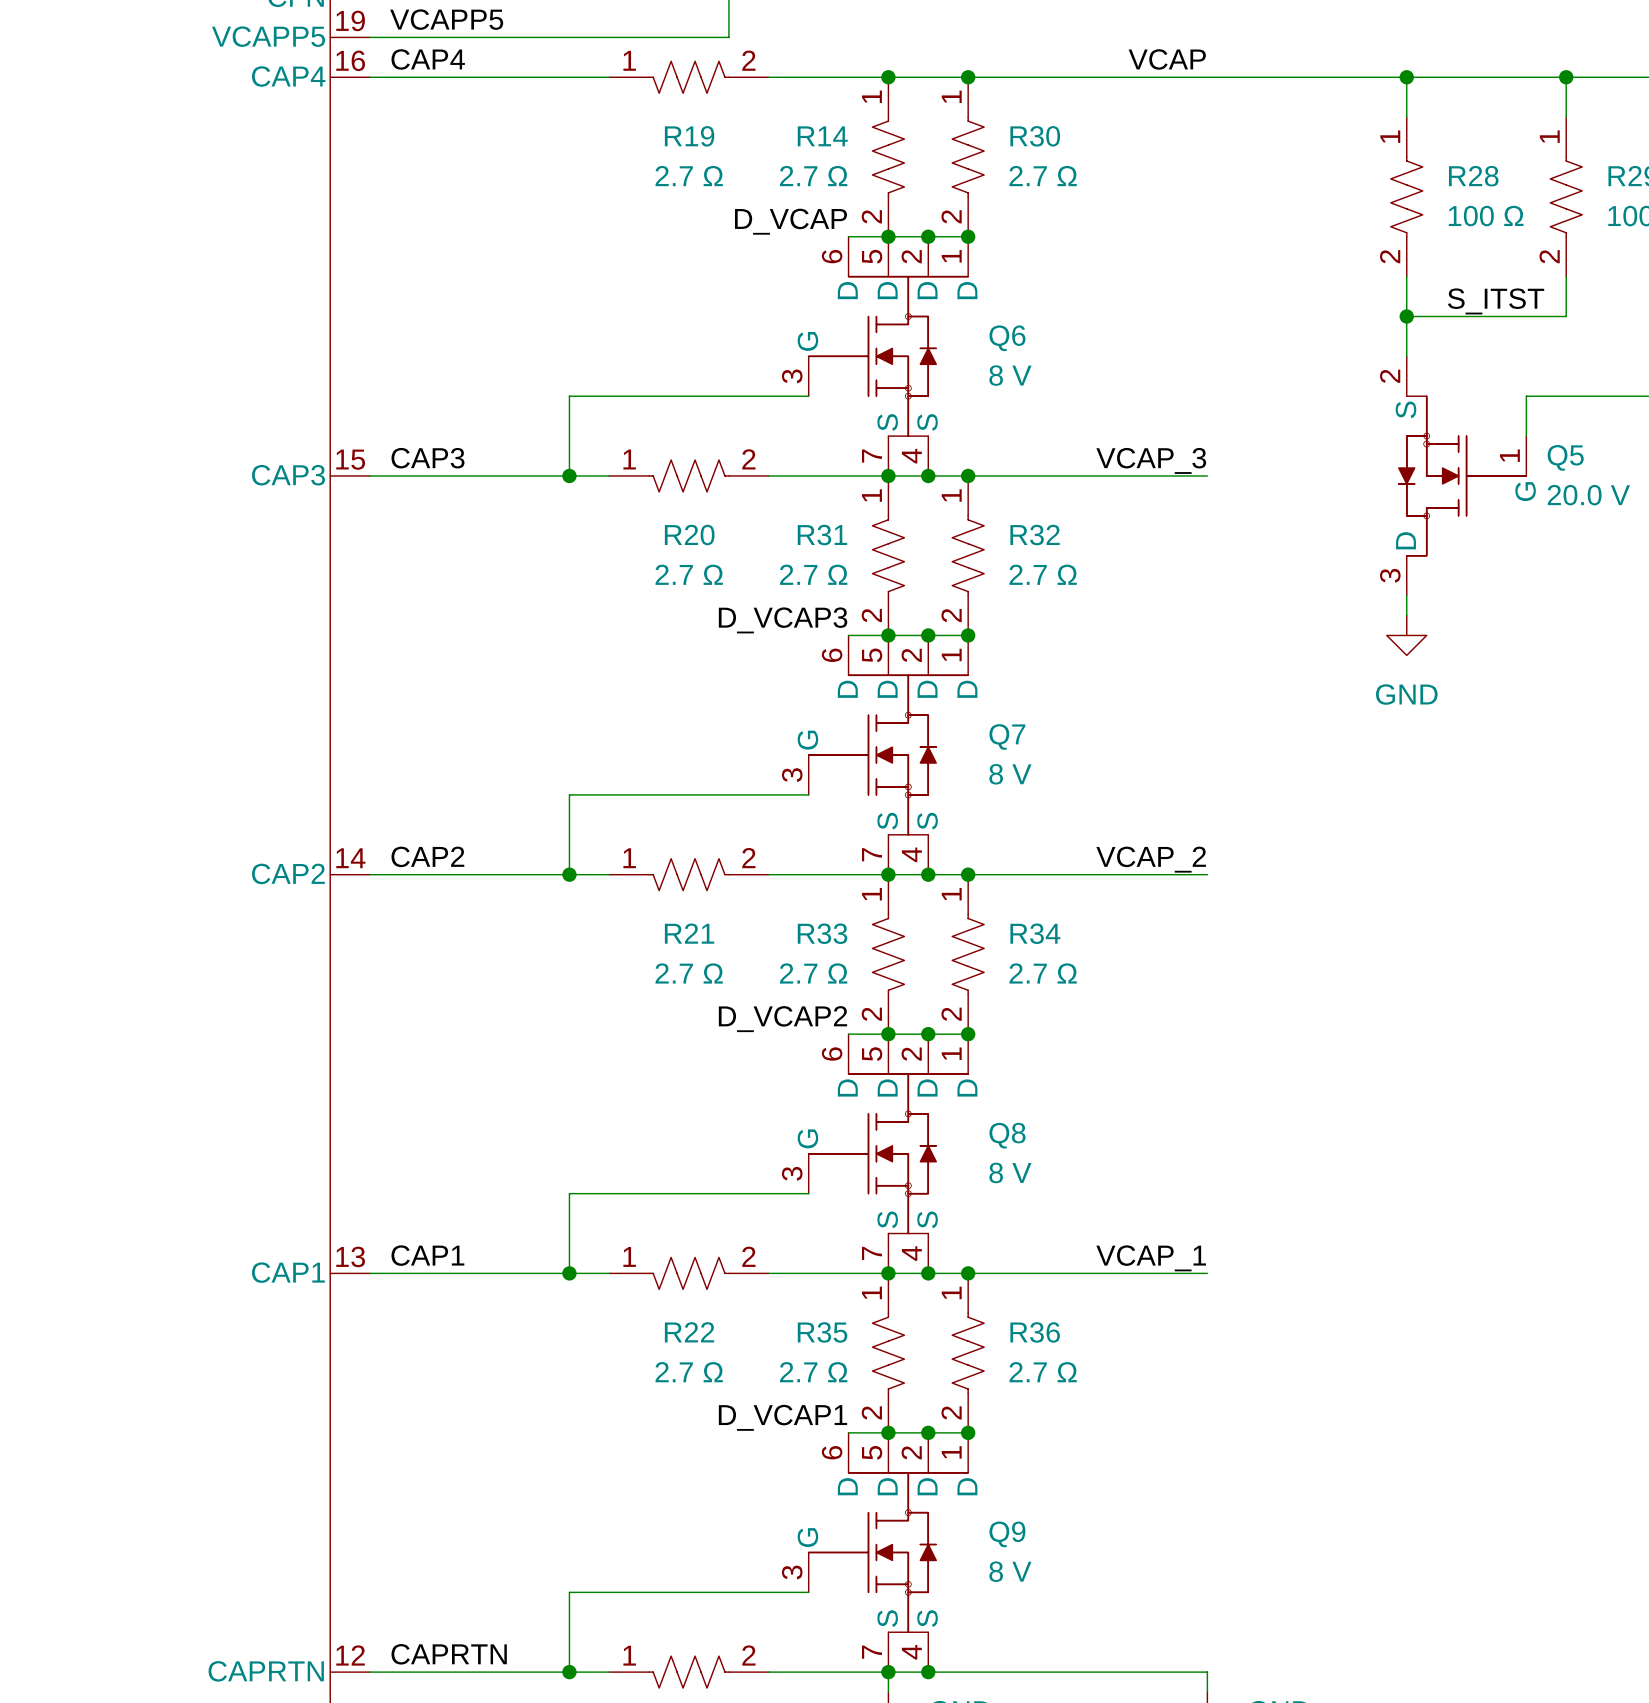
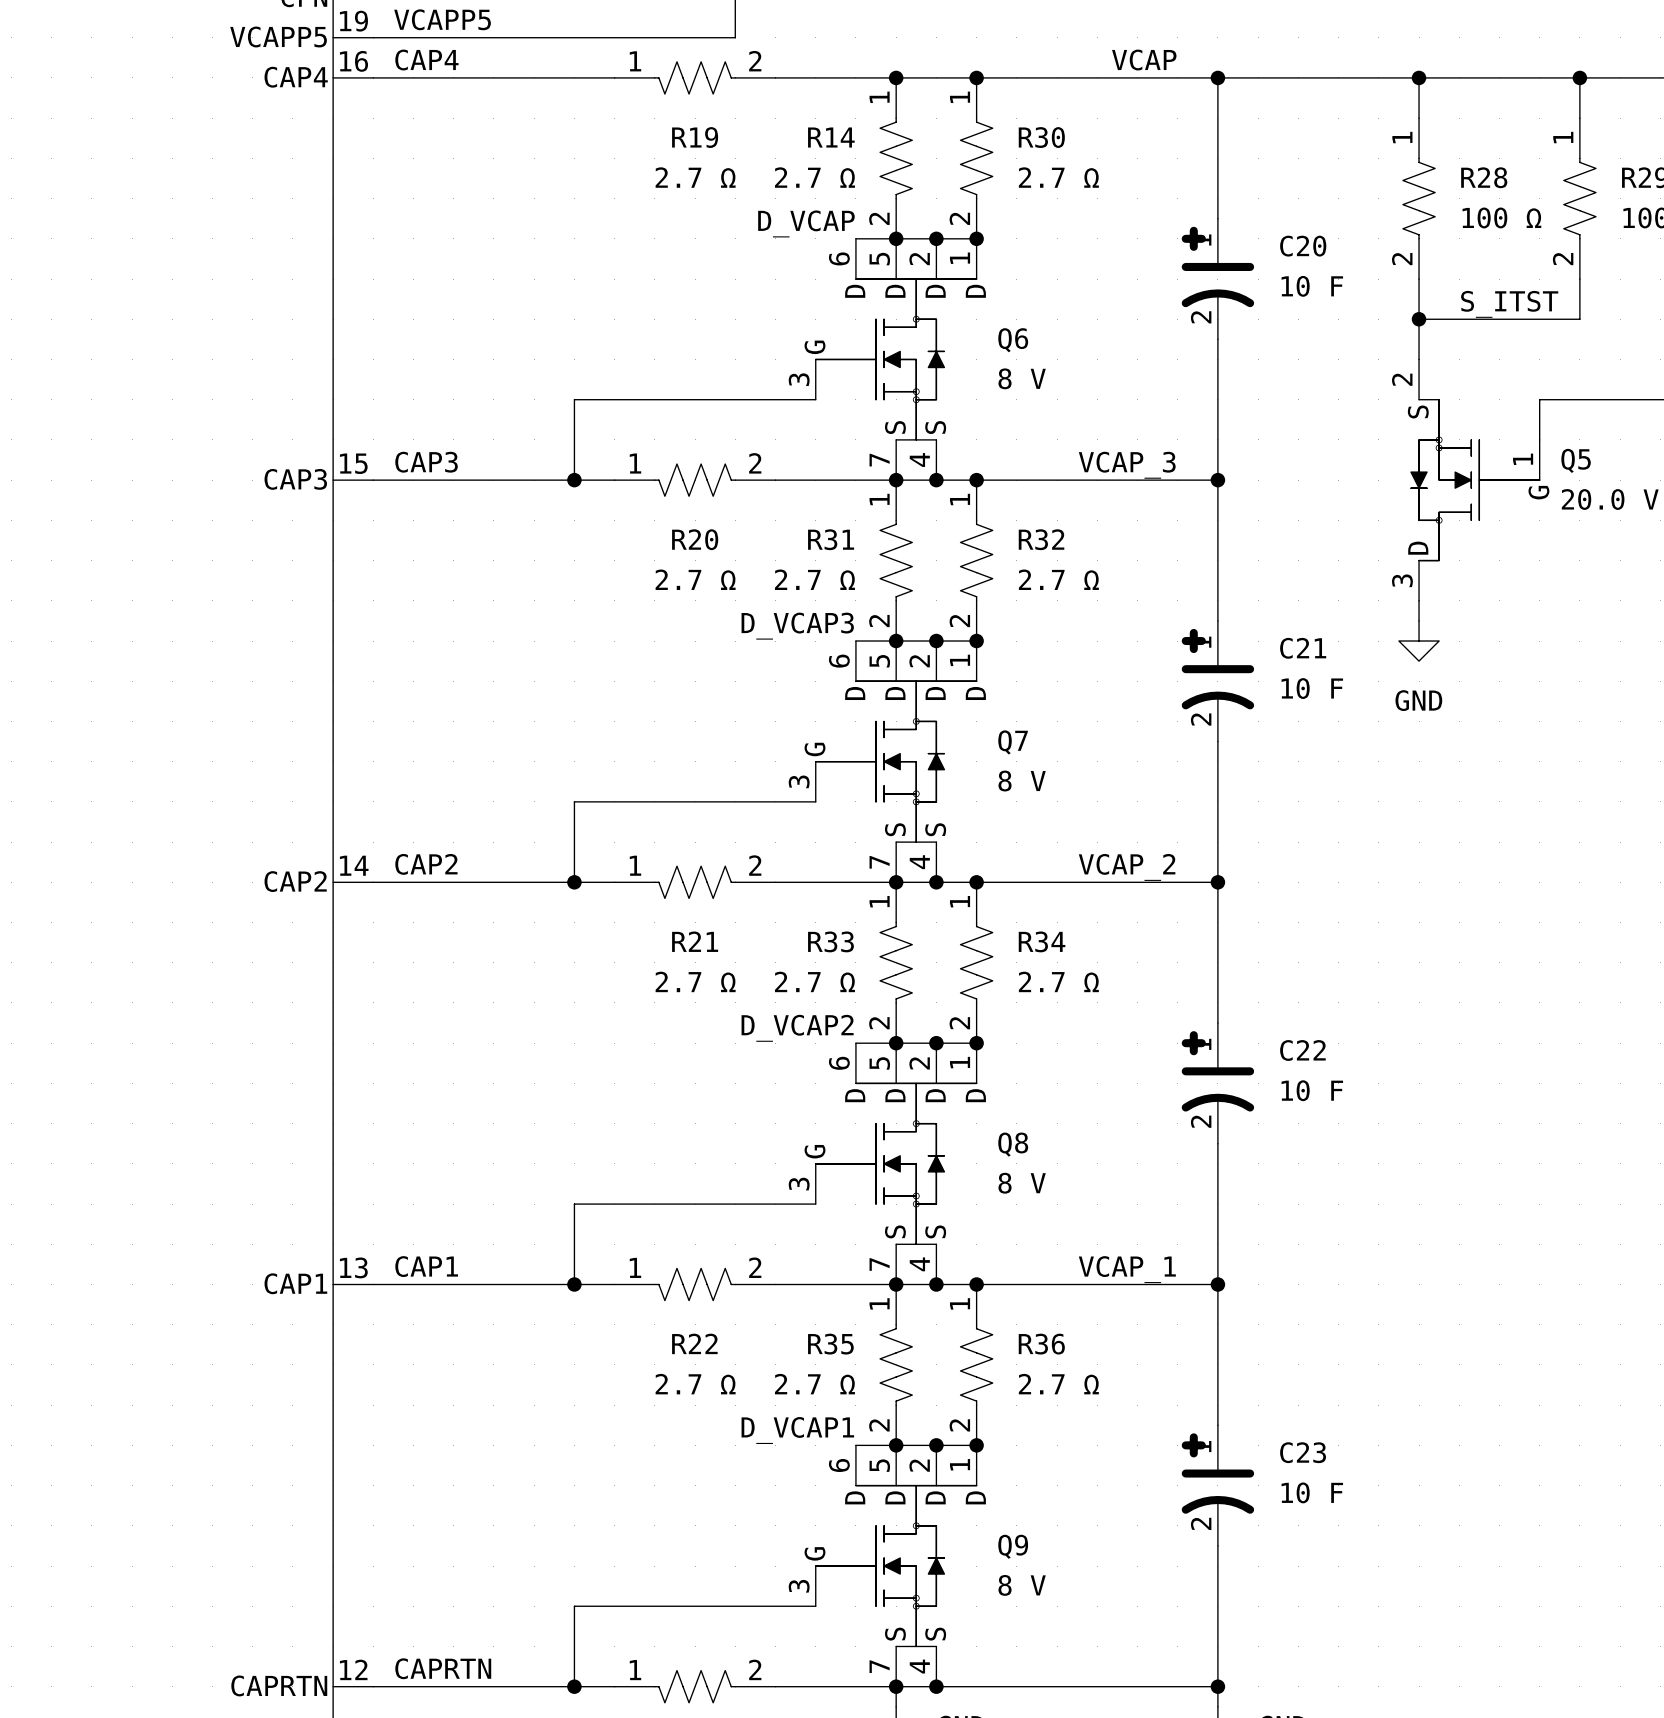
label position: VCAP (1167, 59) -> VCAP (1144, 60)
wire: none -> (1217, 77) (1217, 218)
junction: none -> (1217, 77)
C20: none -> 10 F (1217, 279)
wire: none -> (1217, 339) (1217, 620)
label position: VCAP_3 (1151, 460) -> VCAP_3 (1127, 465)
junction: none -> (1217, 480)
C21: none -> 10 F (1217, 681)
wire: none -> (1217, 741) (1217, 1023)
label position: VCAP_2 (1151, 859) -> VCAP_2 (1127, 867)
junction: none -> (1217, 882)
C22: none -> 10 F (1217, 1083)
wire: none -> (1217, 1143) (1217, 1425)
label position: VCAP_1 (1151, 1258) -> VCAP_1 (1127, 1269)
junction: none -> (1217, 1284)
C23: none -> 10 F (1217, 1485)
wire: none -> (1217, 1545) (1217, 1686)
junction: none -> (1217, 1686)

